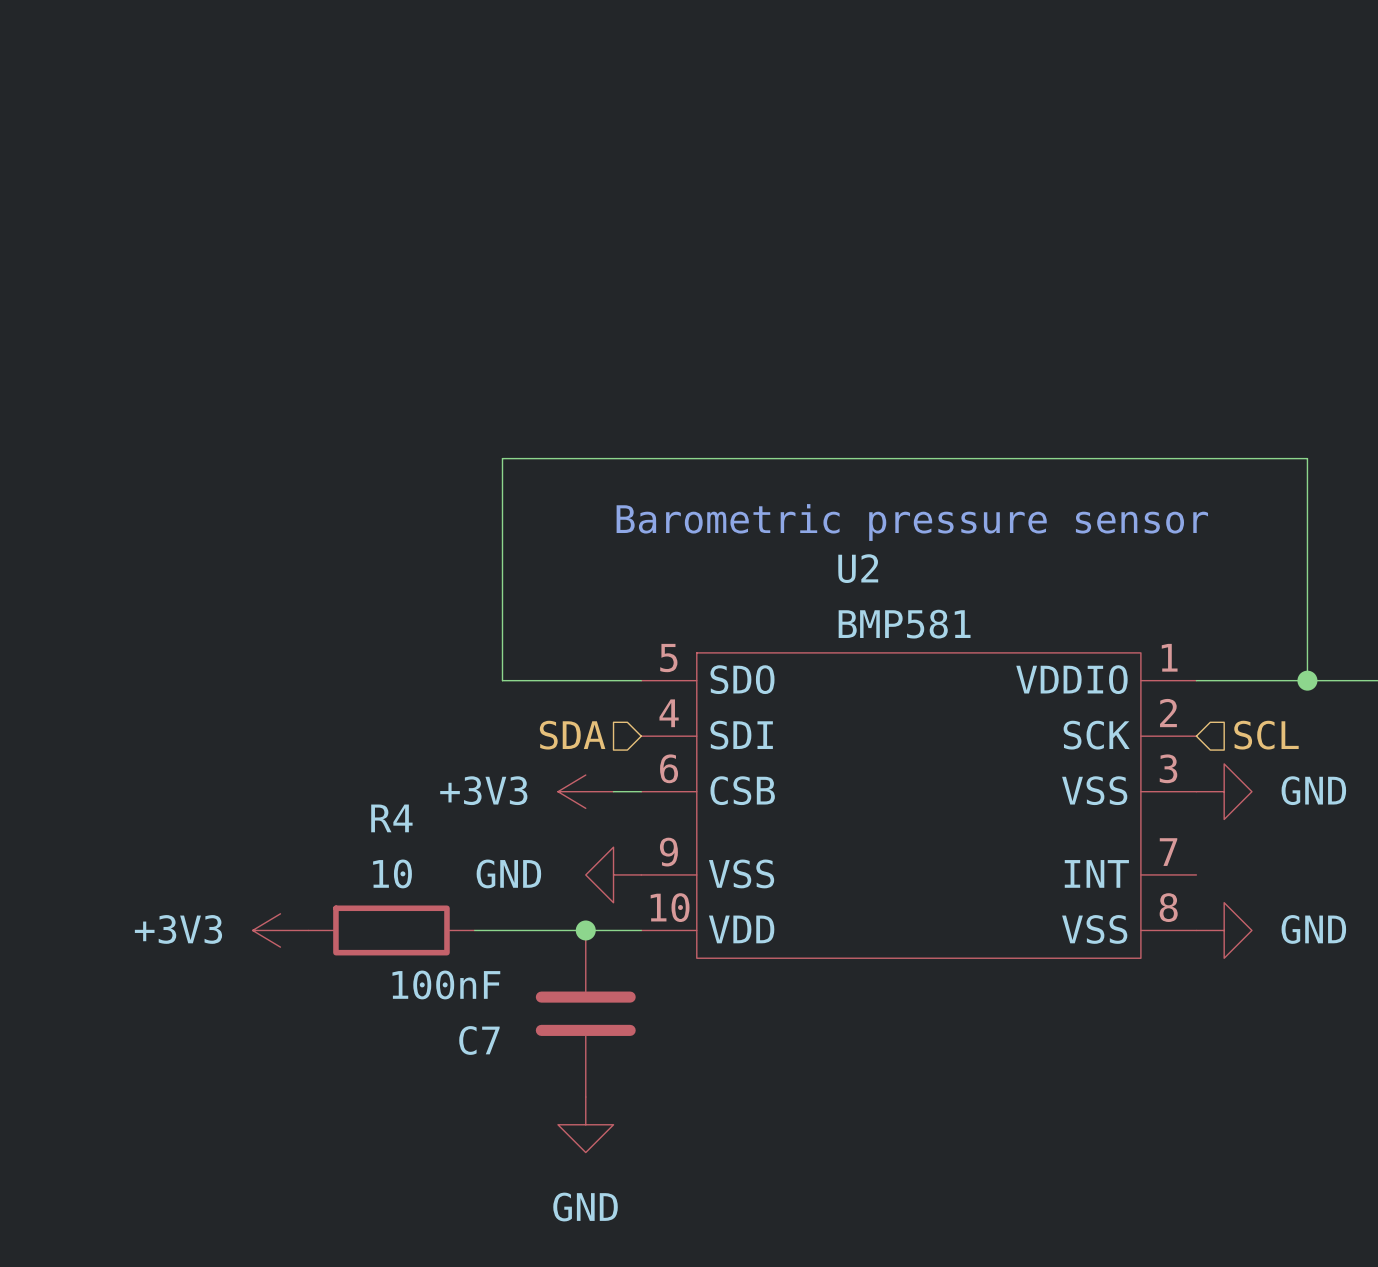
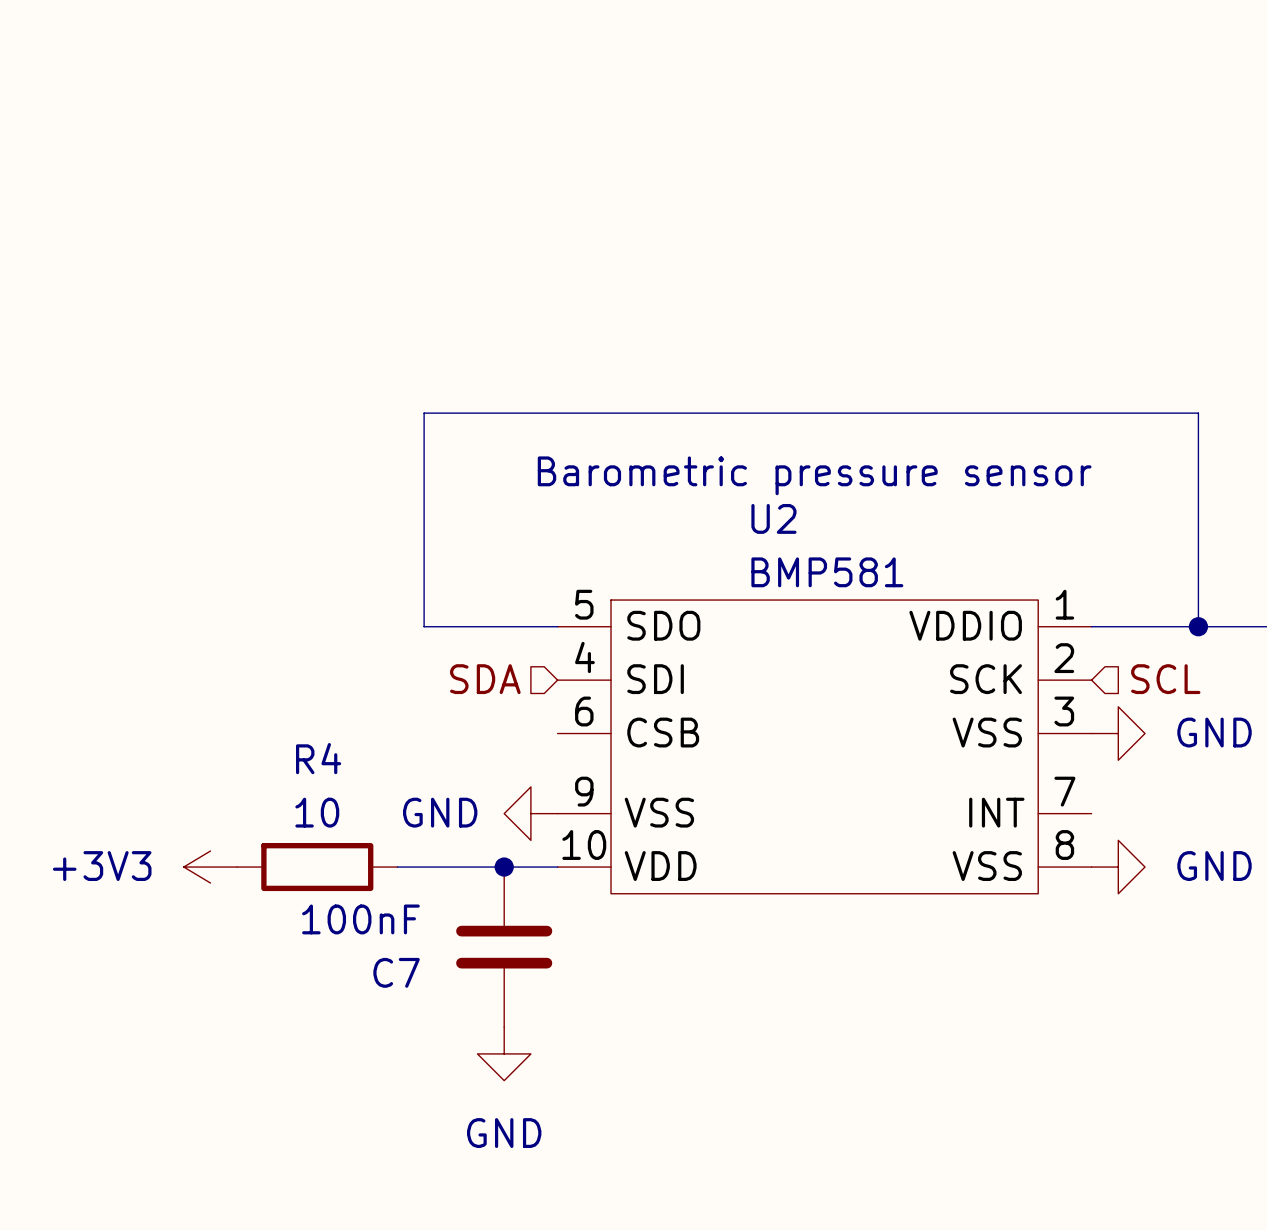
power symbol: +3V3 (585, 791) -> none
wire: (613, 791) (641, 791) -> none

